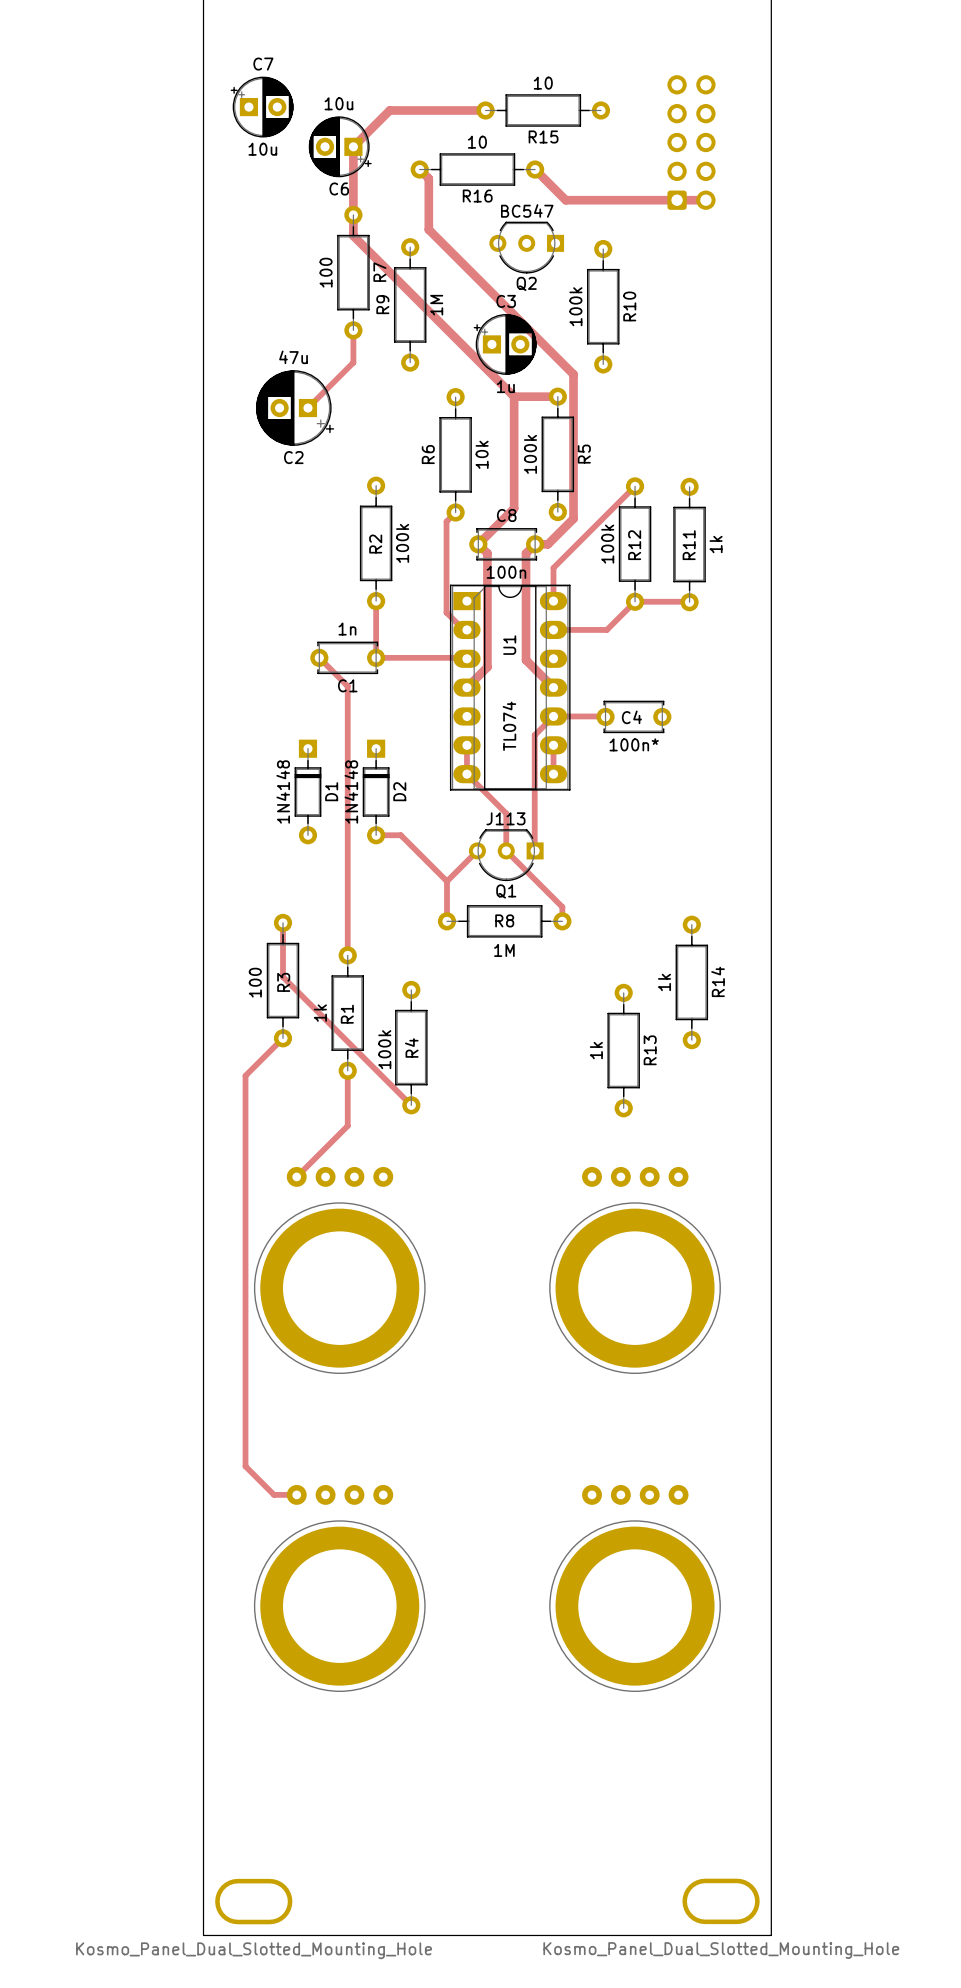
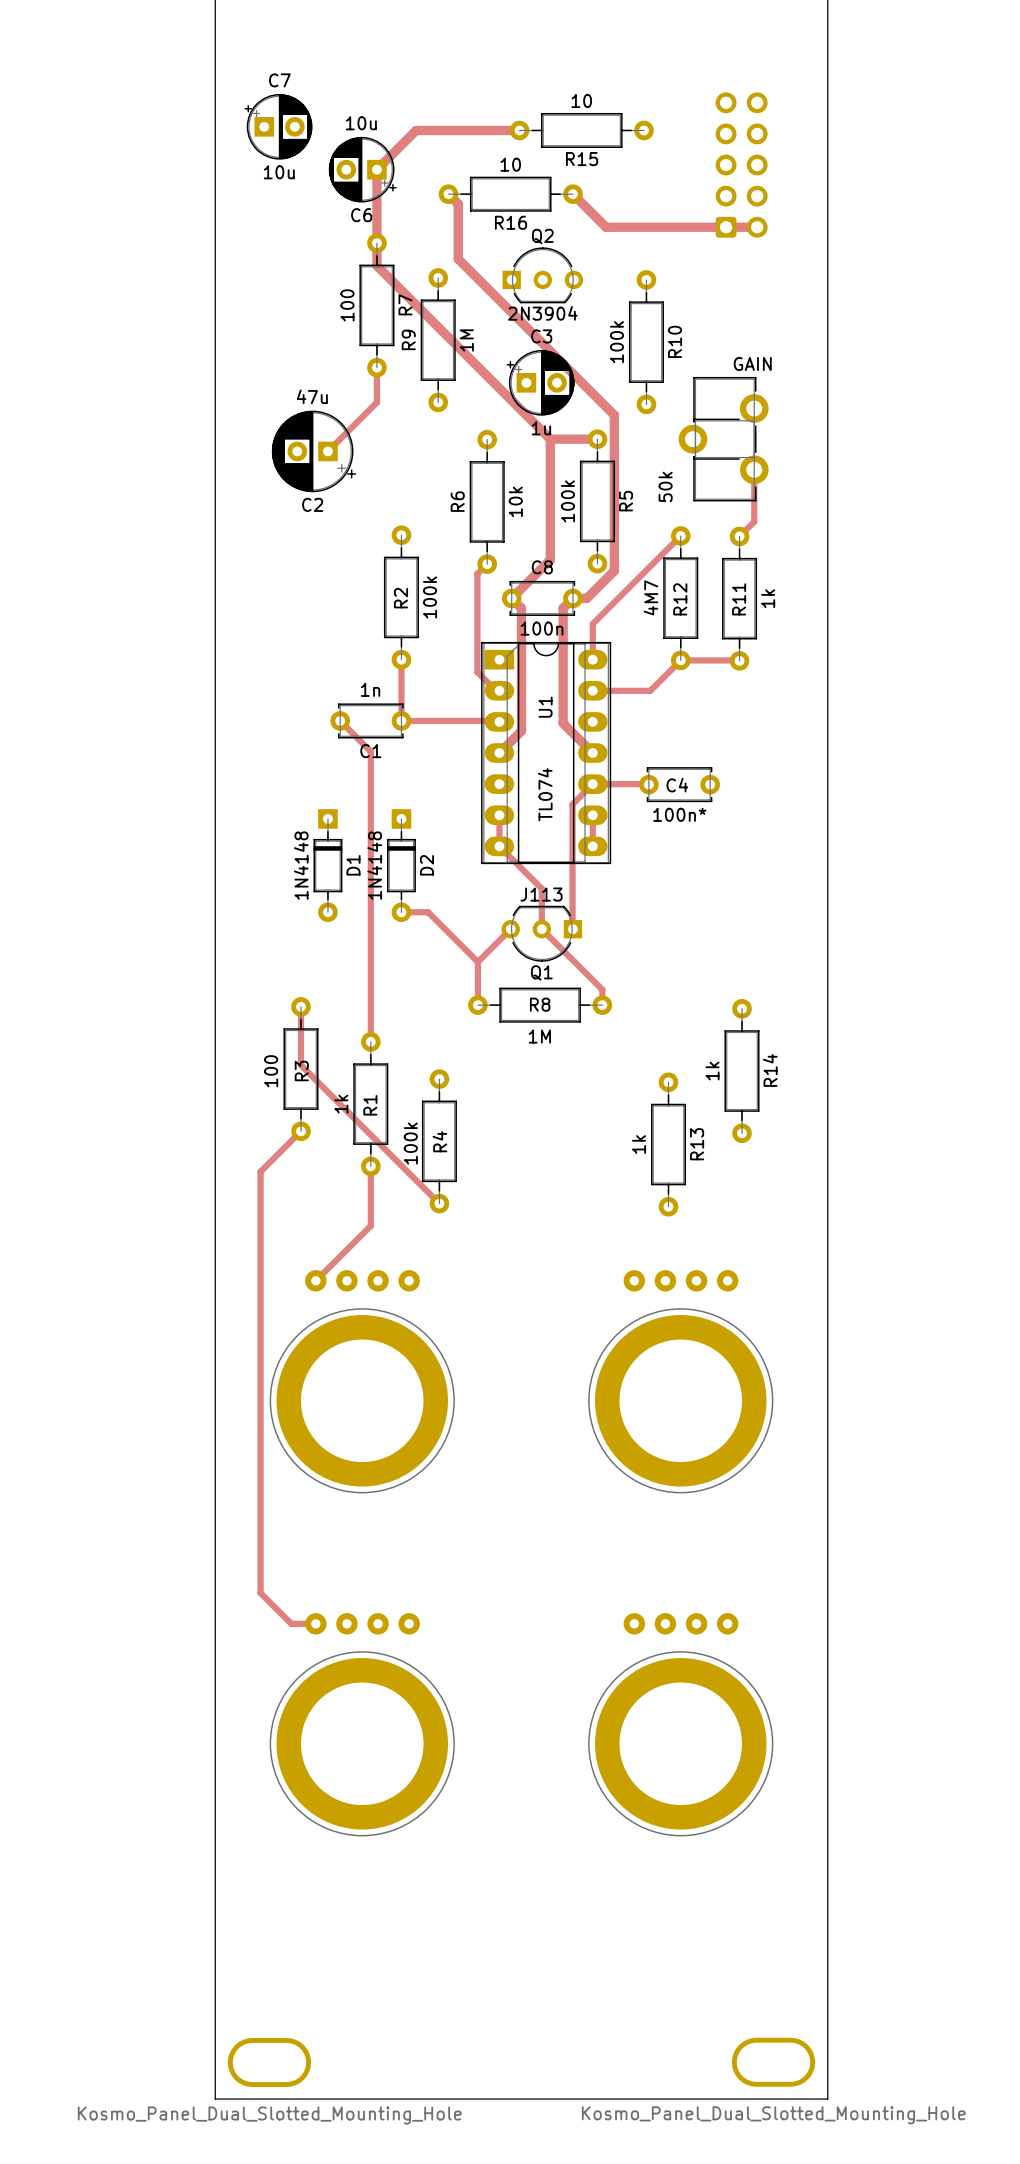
Q2 value: BC547 (527, 210) -> 2N3904 (542, 313)
Q2 rotation: 0° (526, 247) -> 180° (542, 275)
part: none -> 50k (723, 439)
track: none -> (754, 469) (754, 521) (739, 536)
R12 value: 100k (607, 544) -> 4M7 (650, 597)

